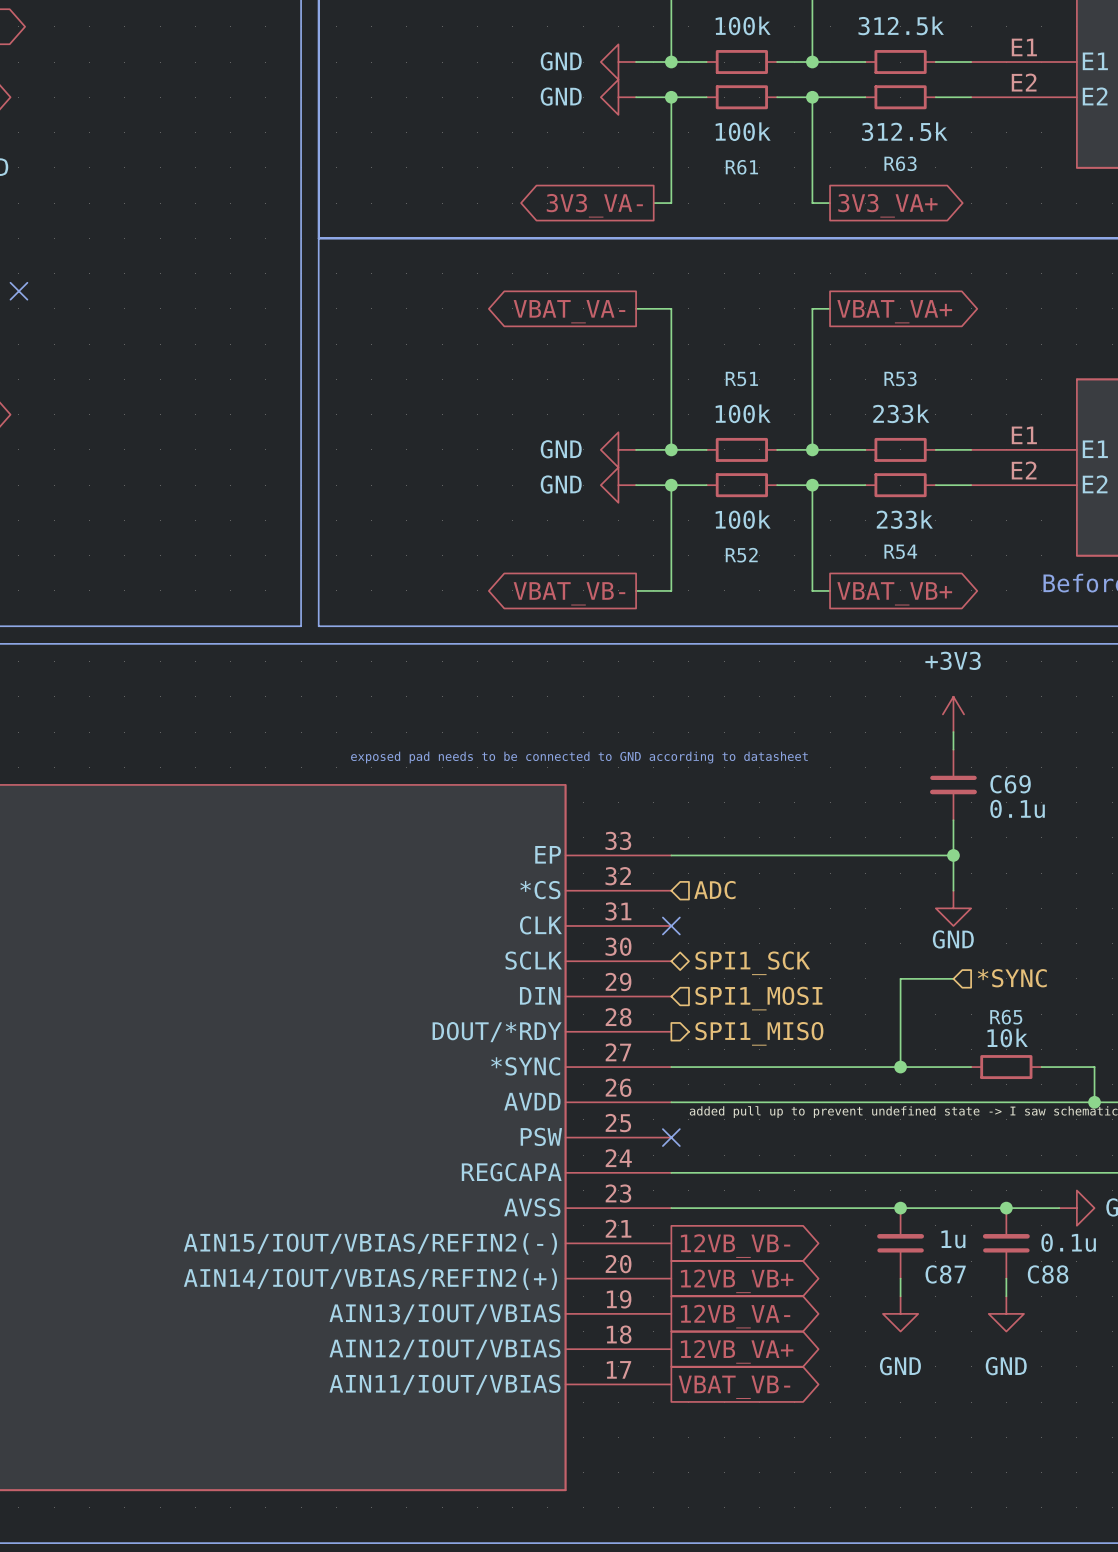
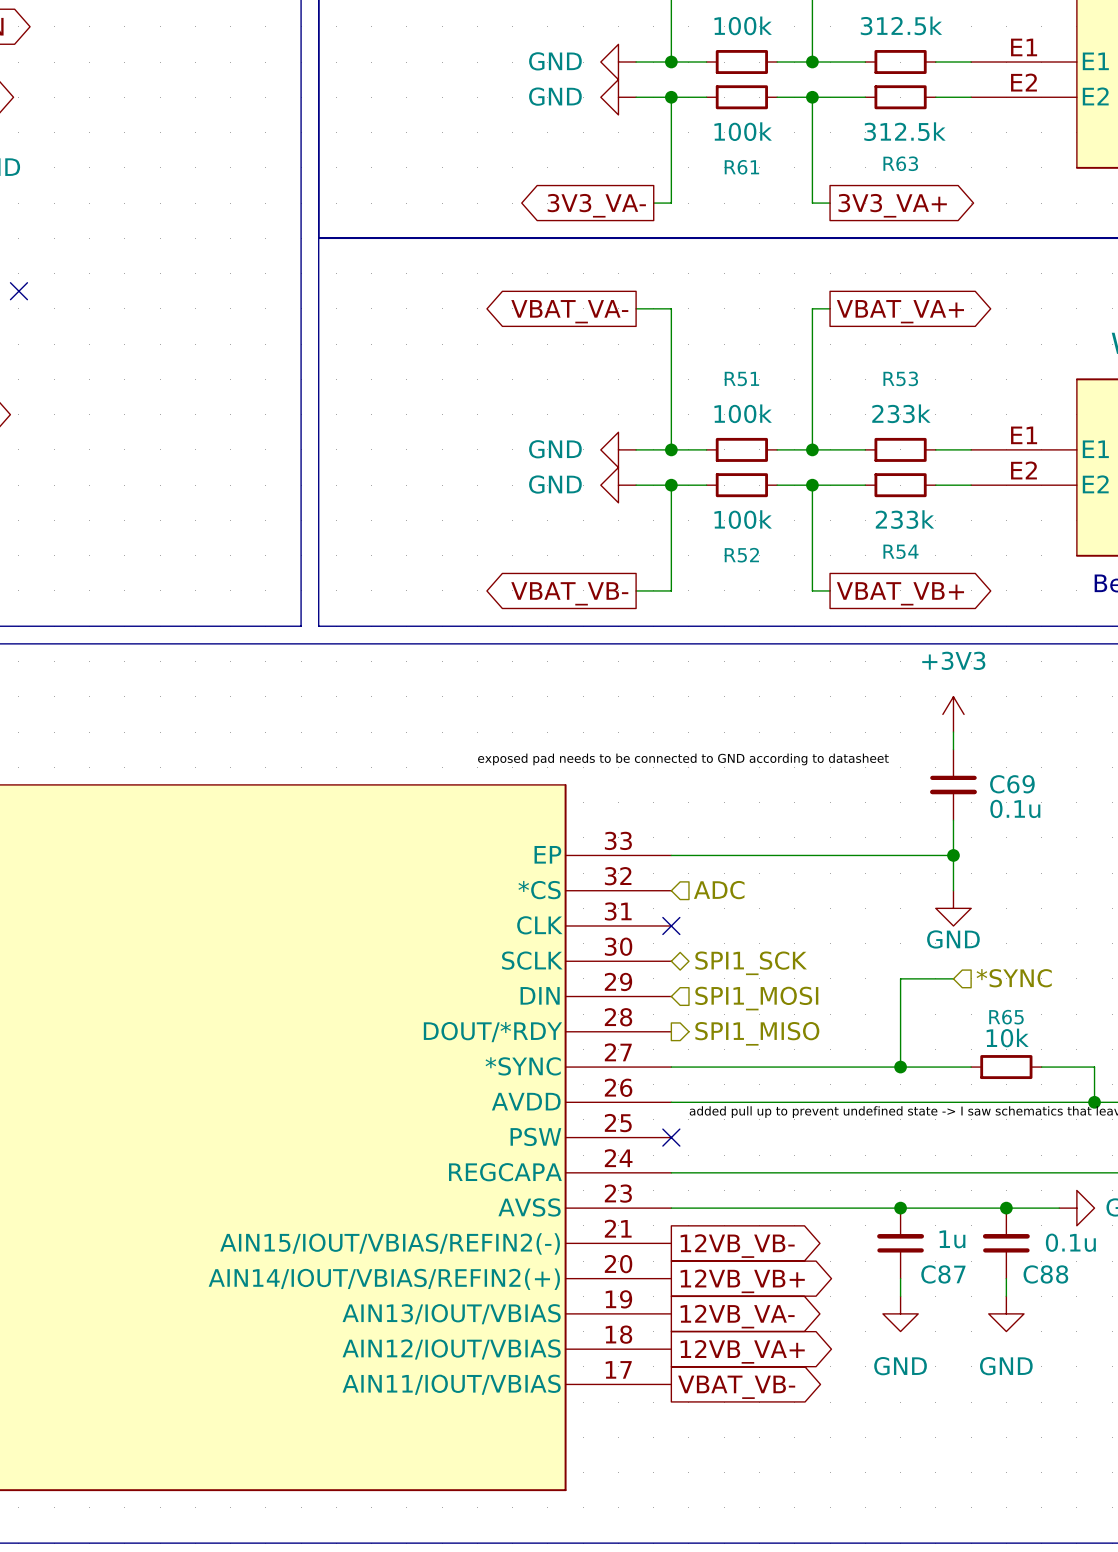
text: exposed pad needs to be connected to GND according to datasheet (579, 757) -> none
label: none -> exposed pad needs to be connected to GND according to datasheet (683, 759)

